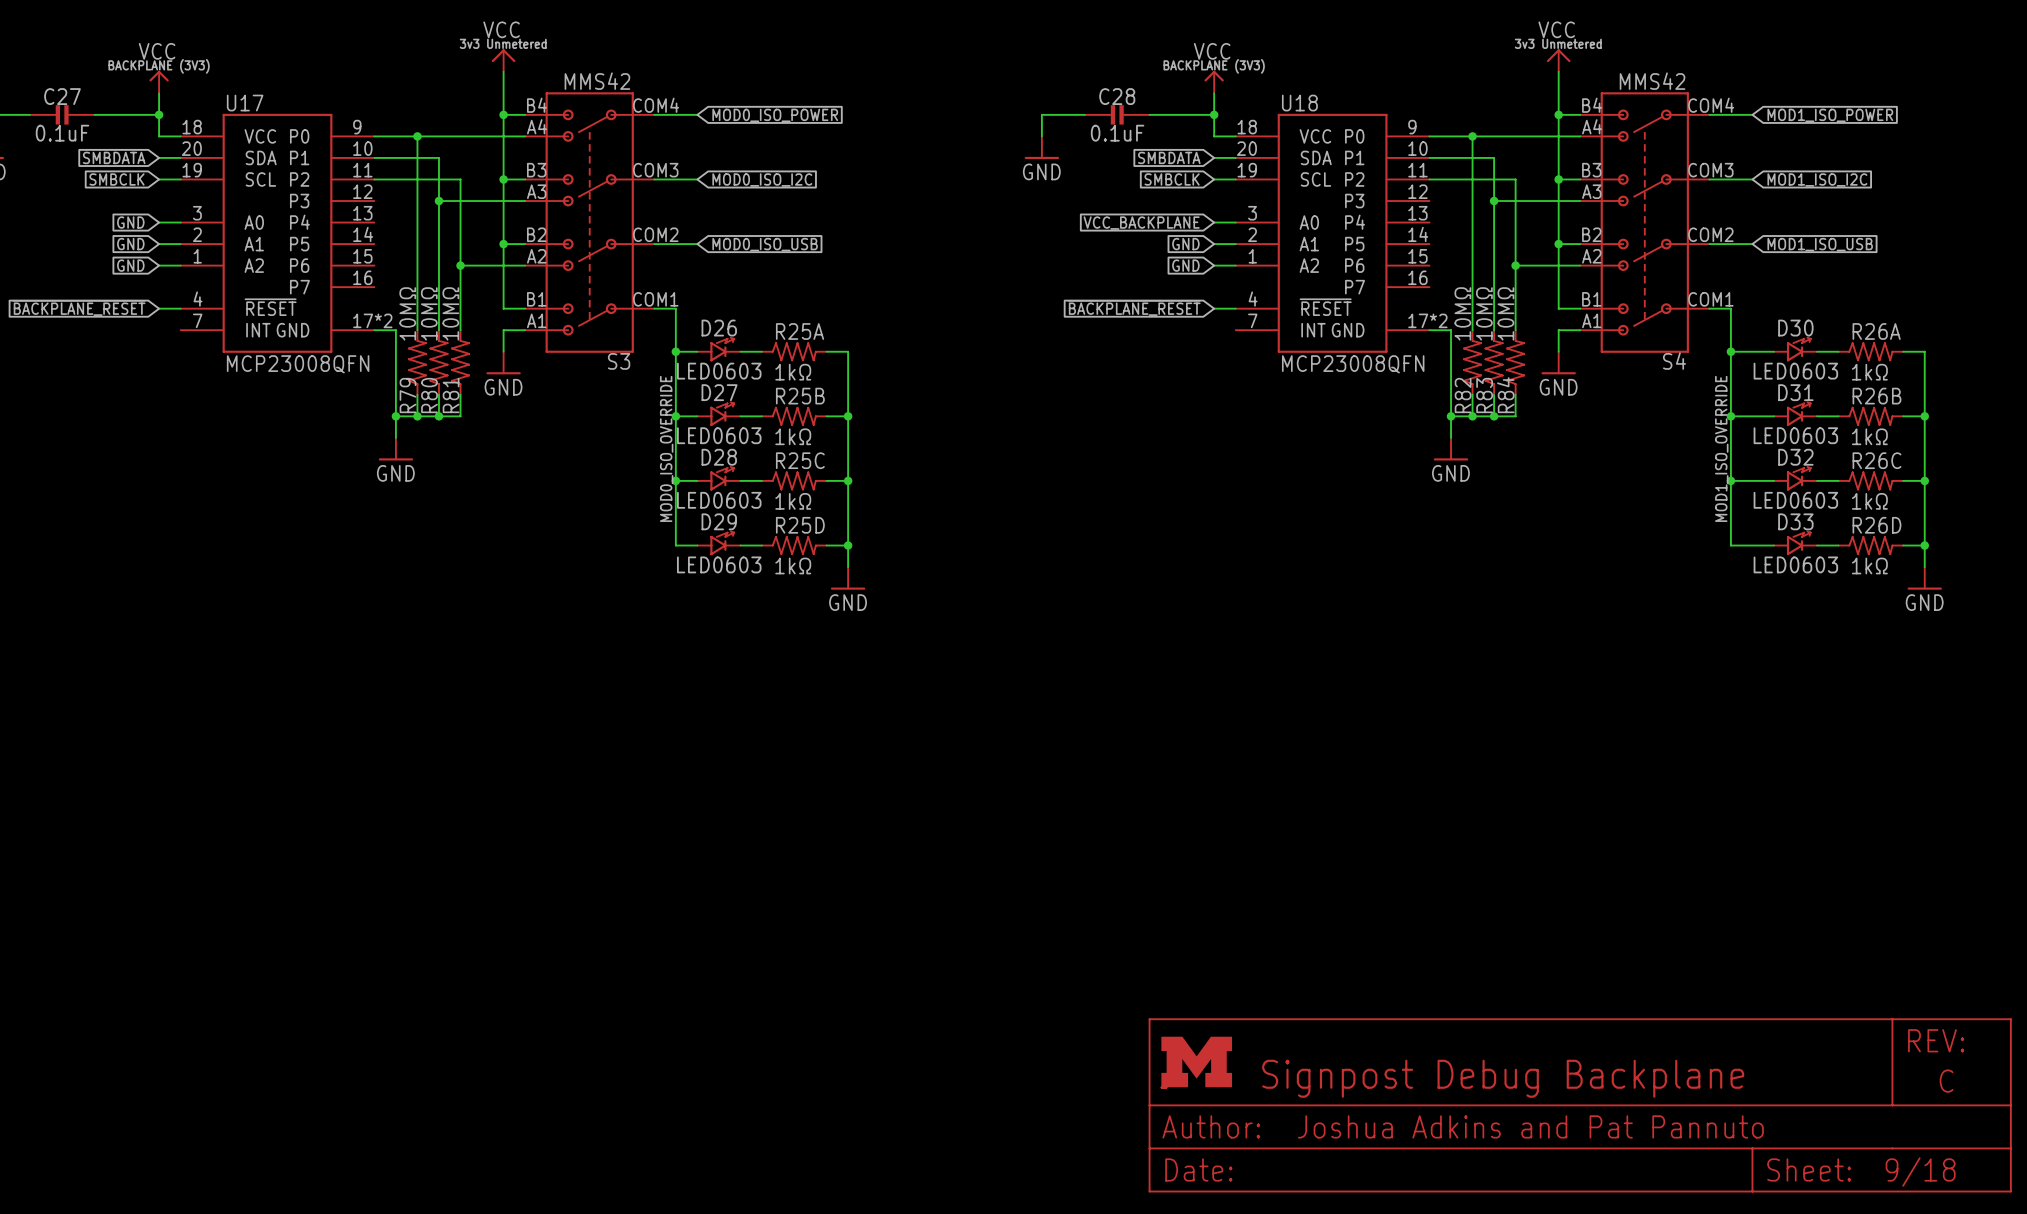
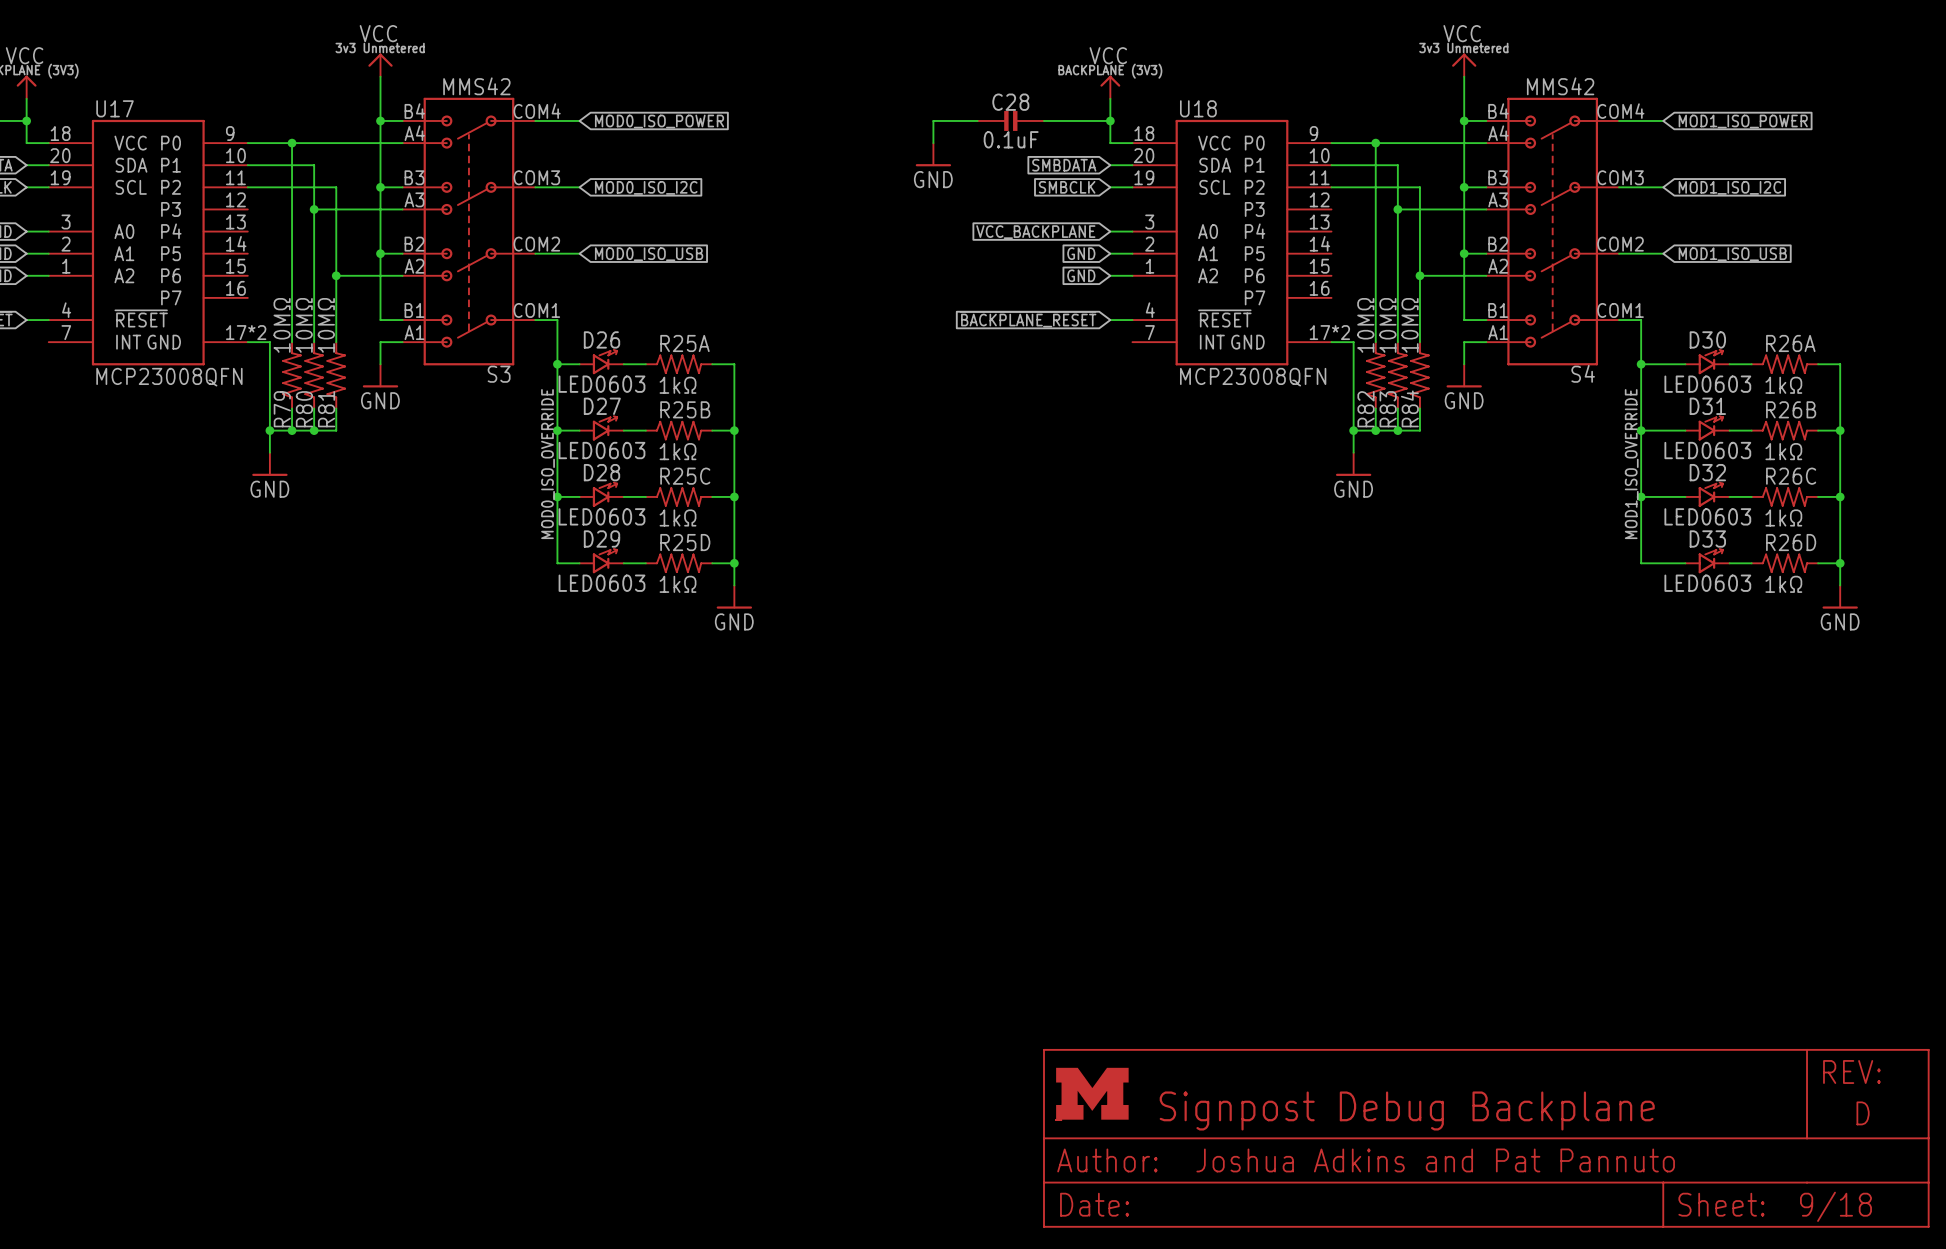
part text: C (1946, 1081) -> D (1863, 1113)

